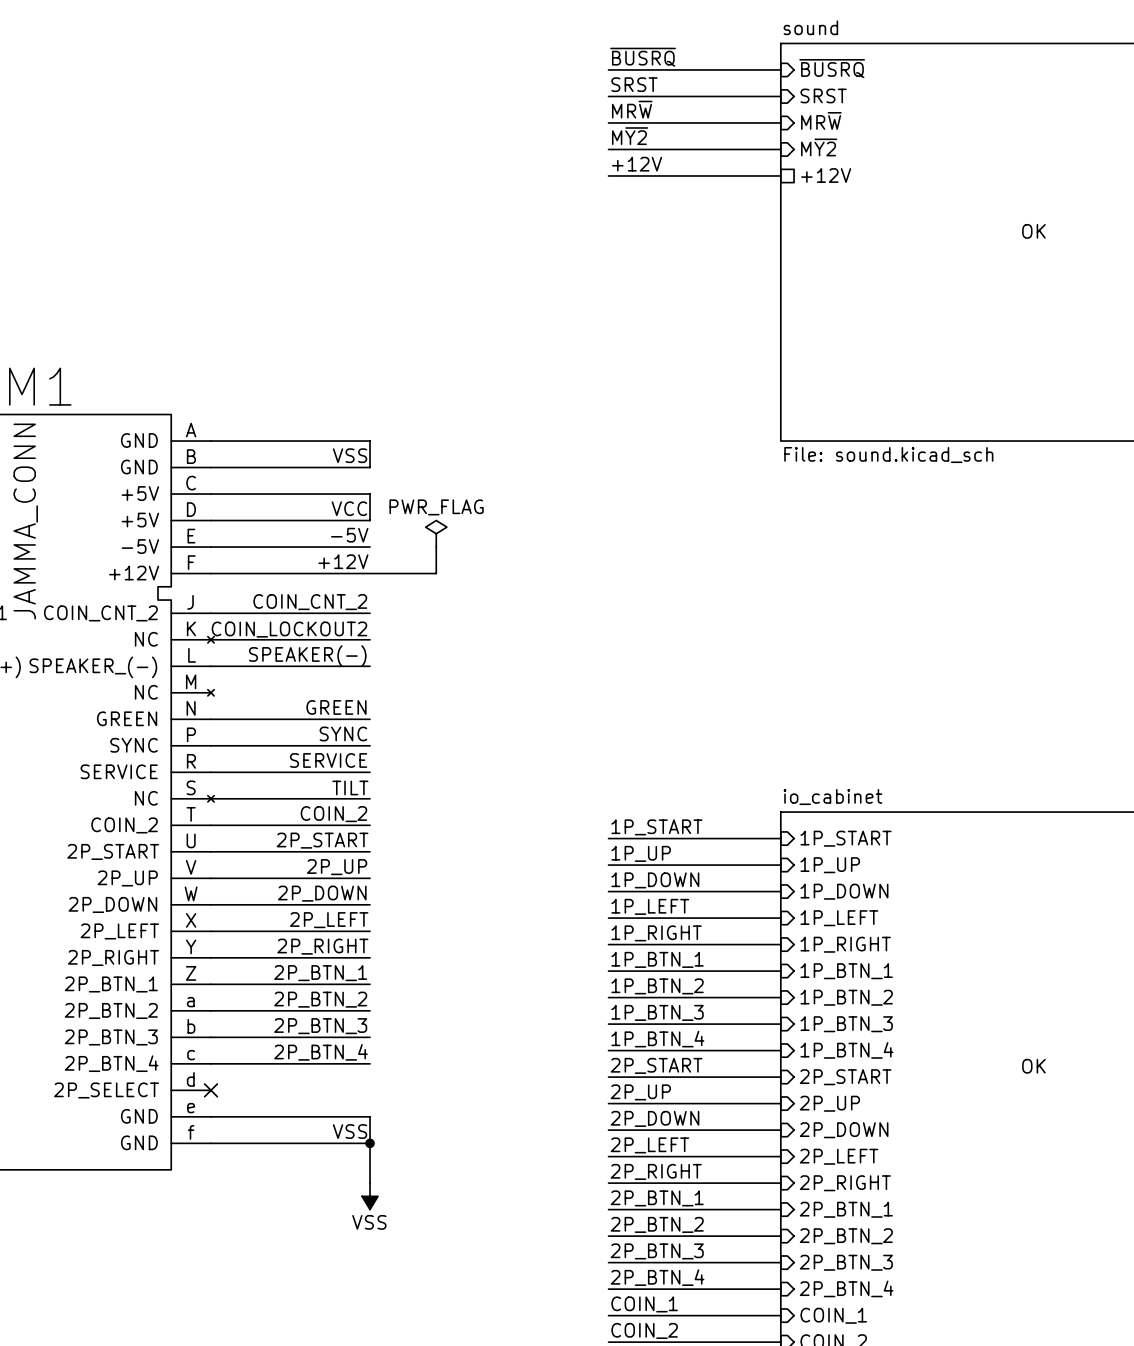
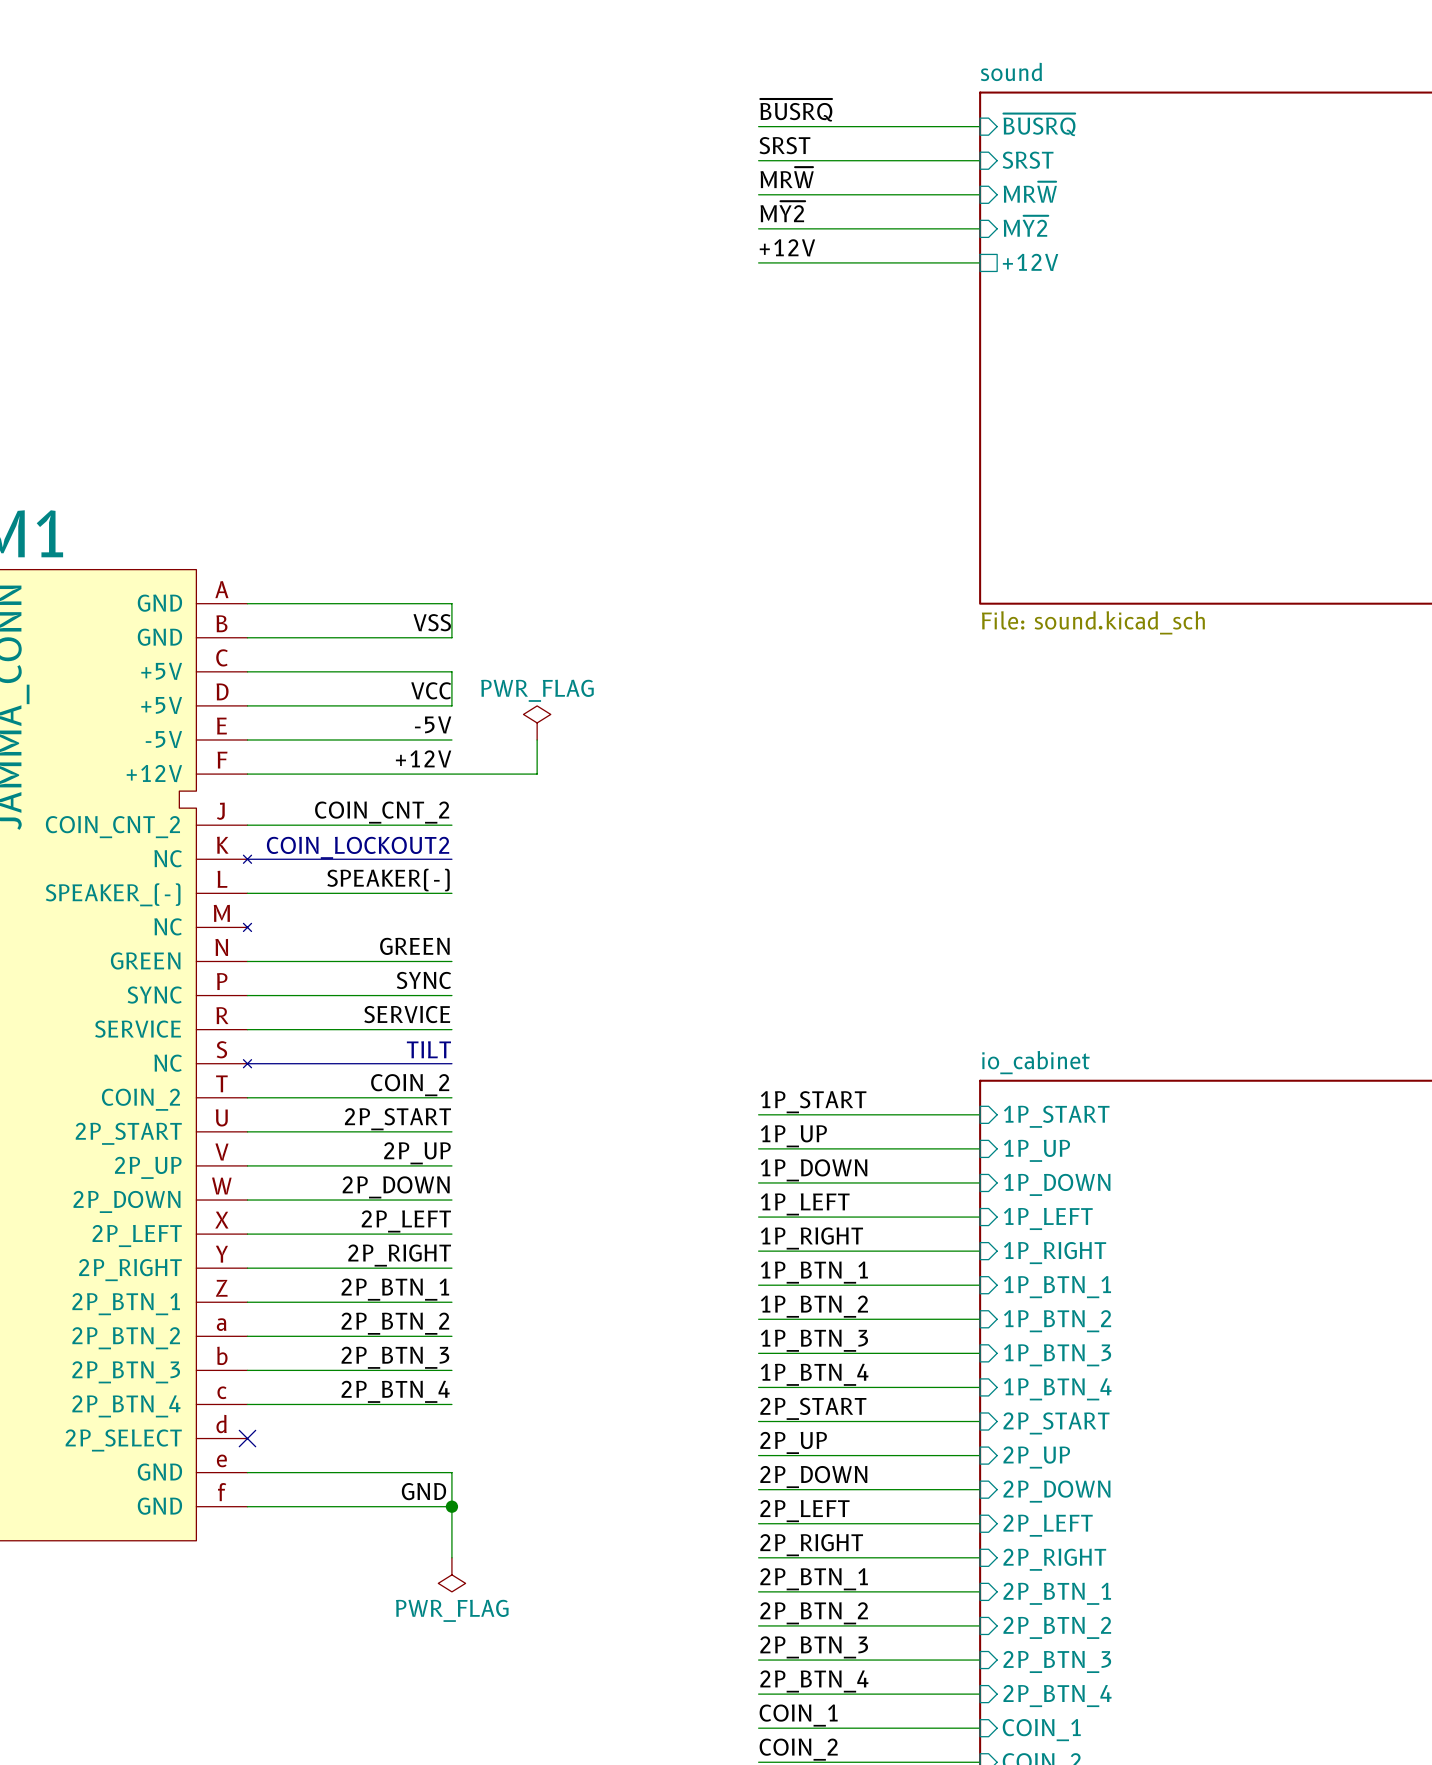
text: OK (1033, 231) -> none
text: OK (1033, 1066) -> none
label: VSS (350, 1131) -> none
label: none -> GND (423, 1491)
power symbol: VSS (370, 1196) -> PWR_FLAG (451, 1574)

